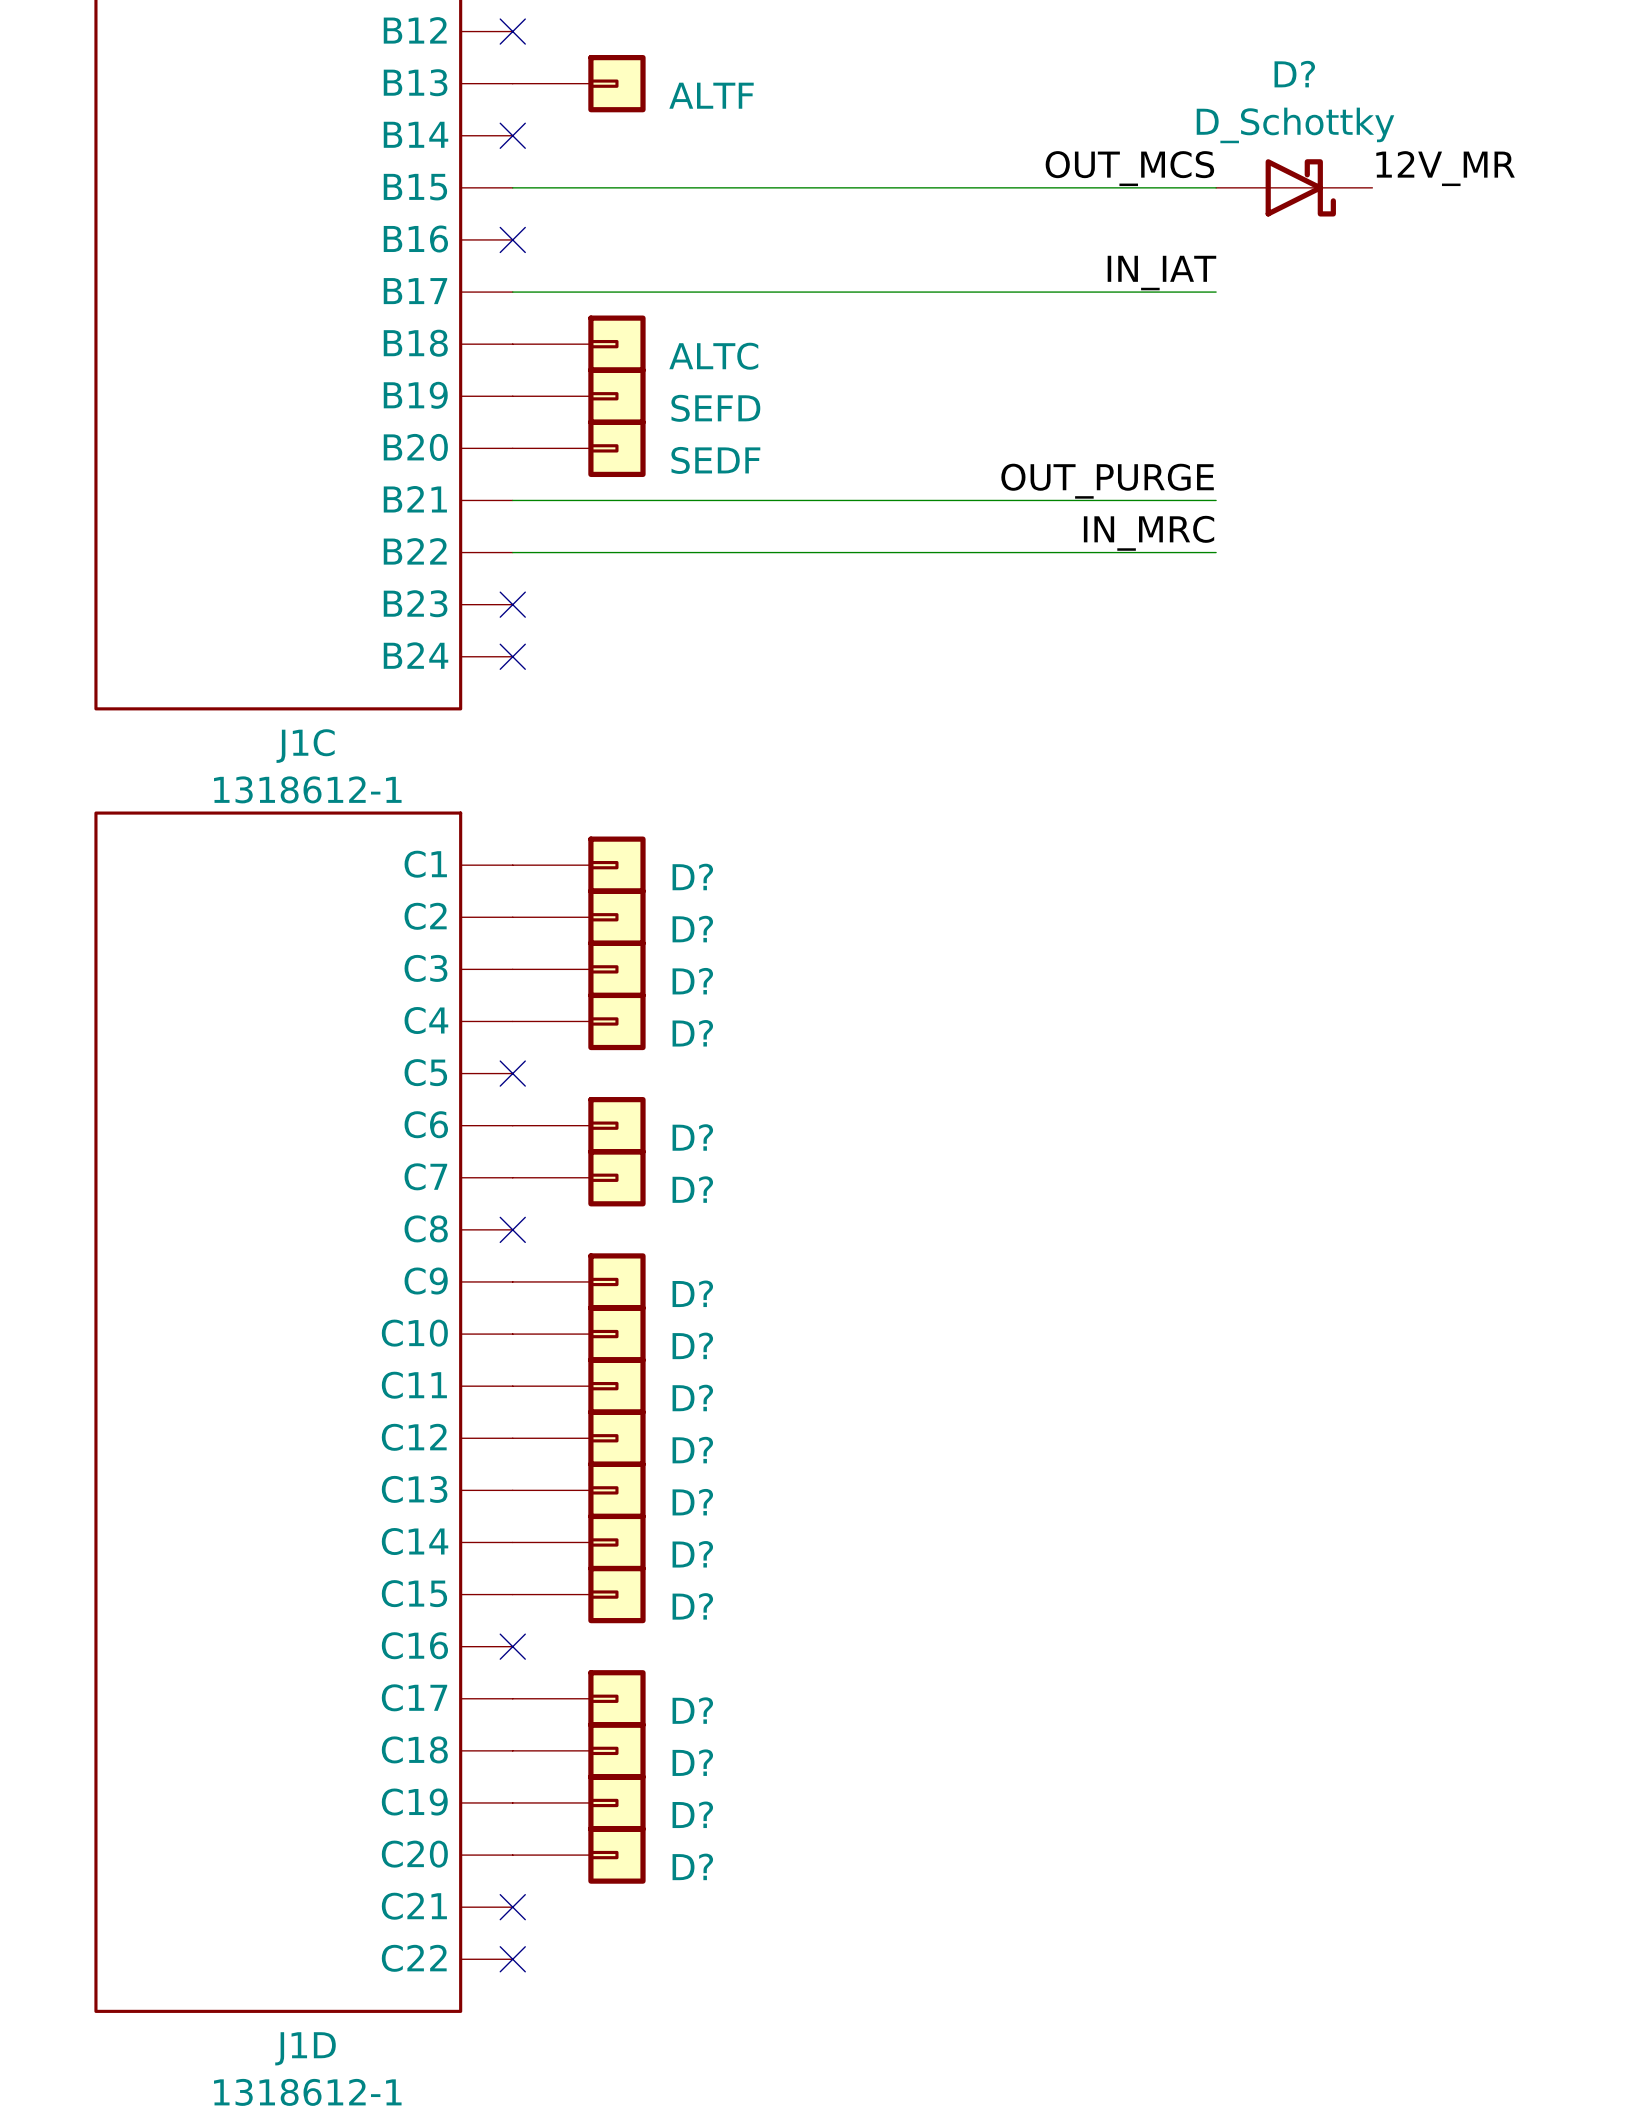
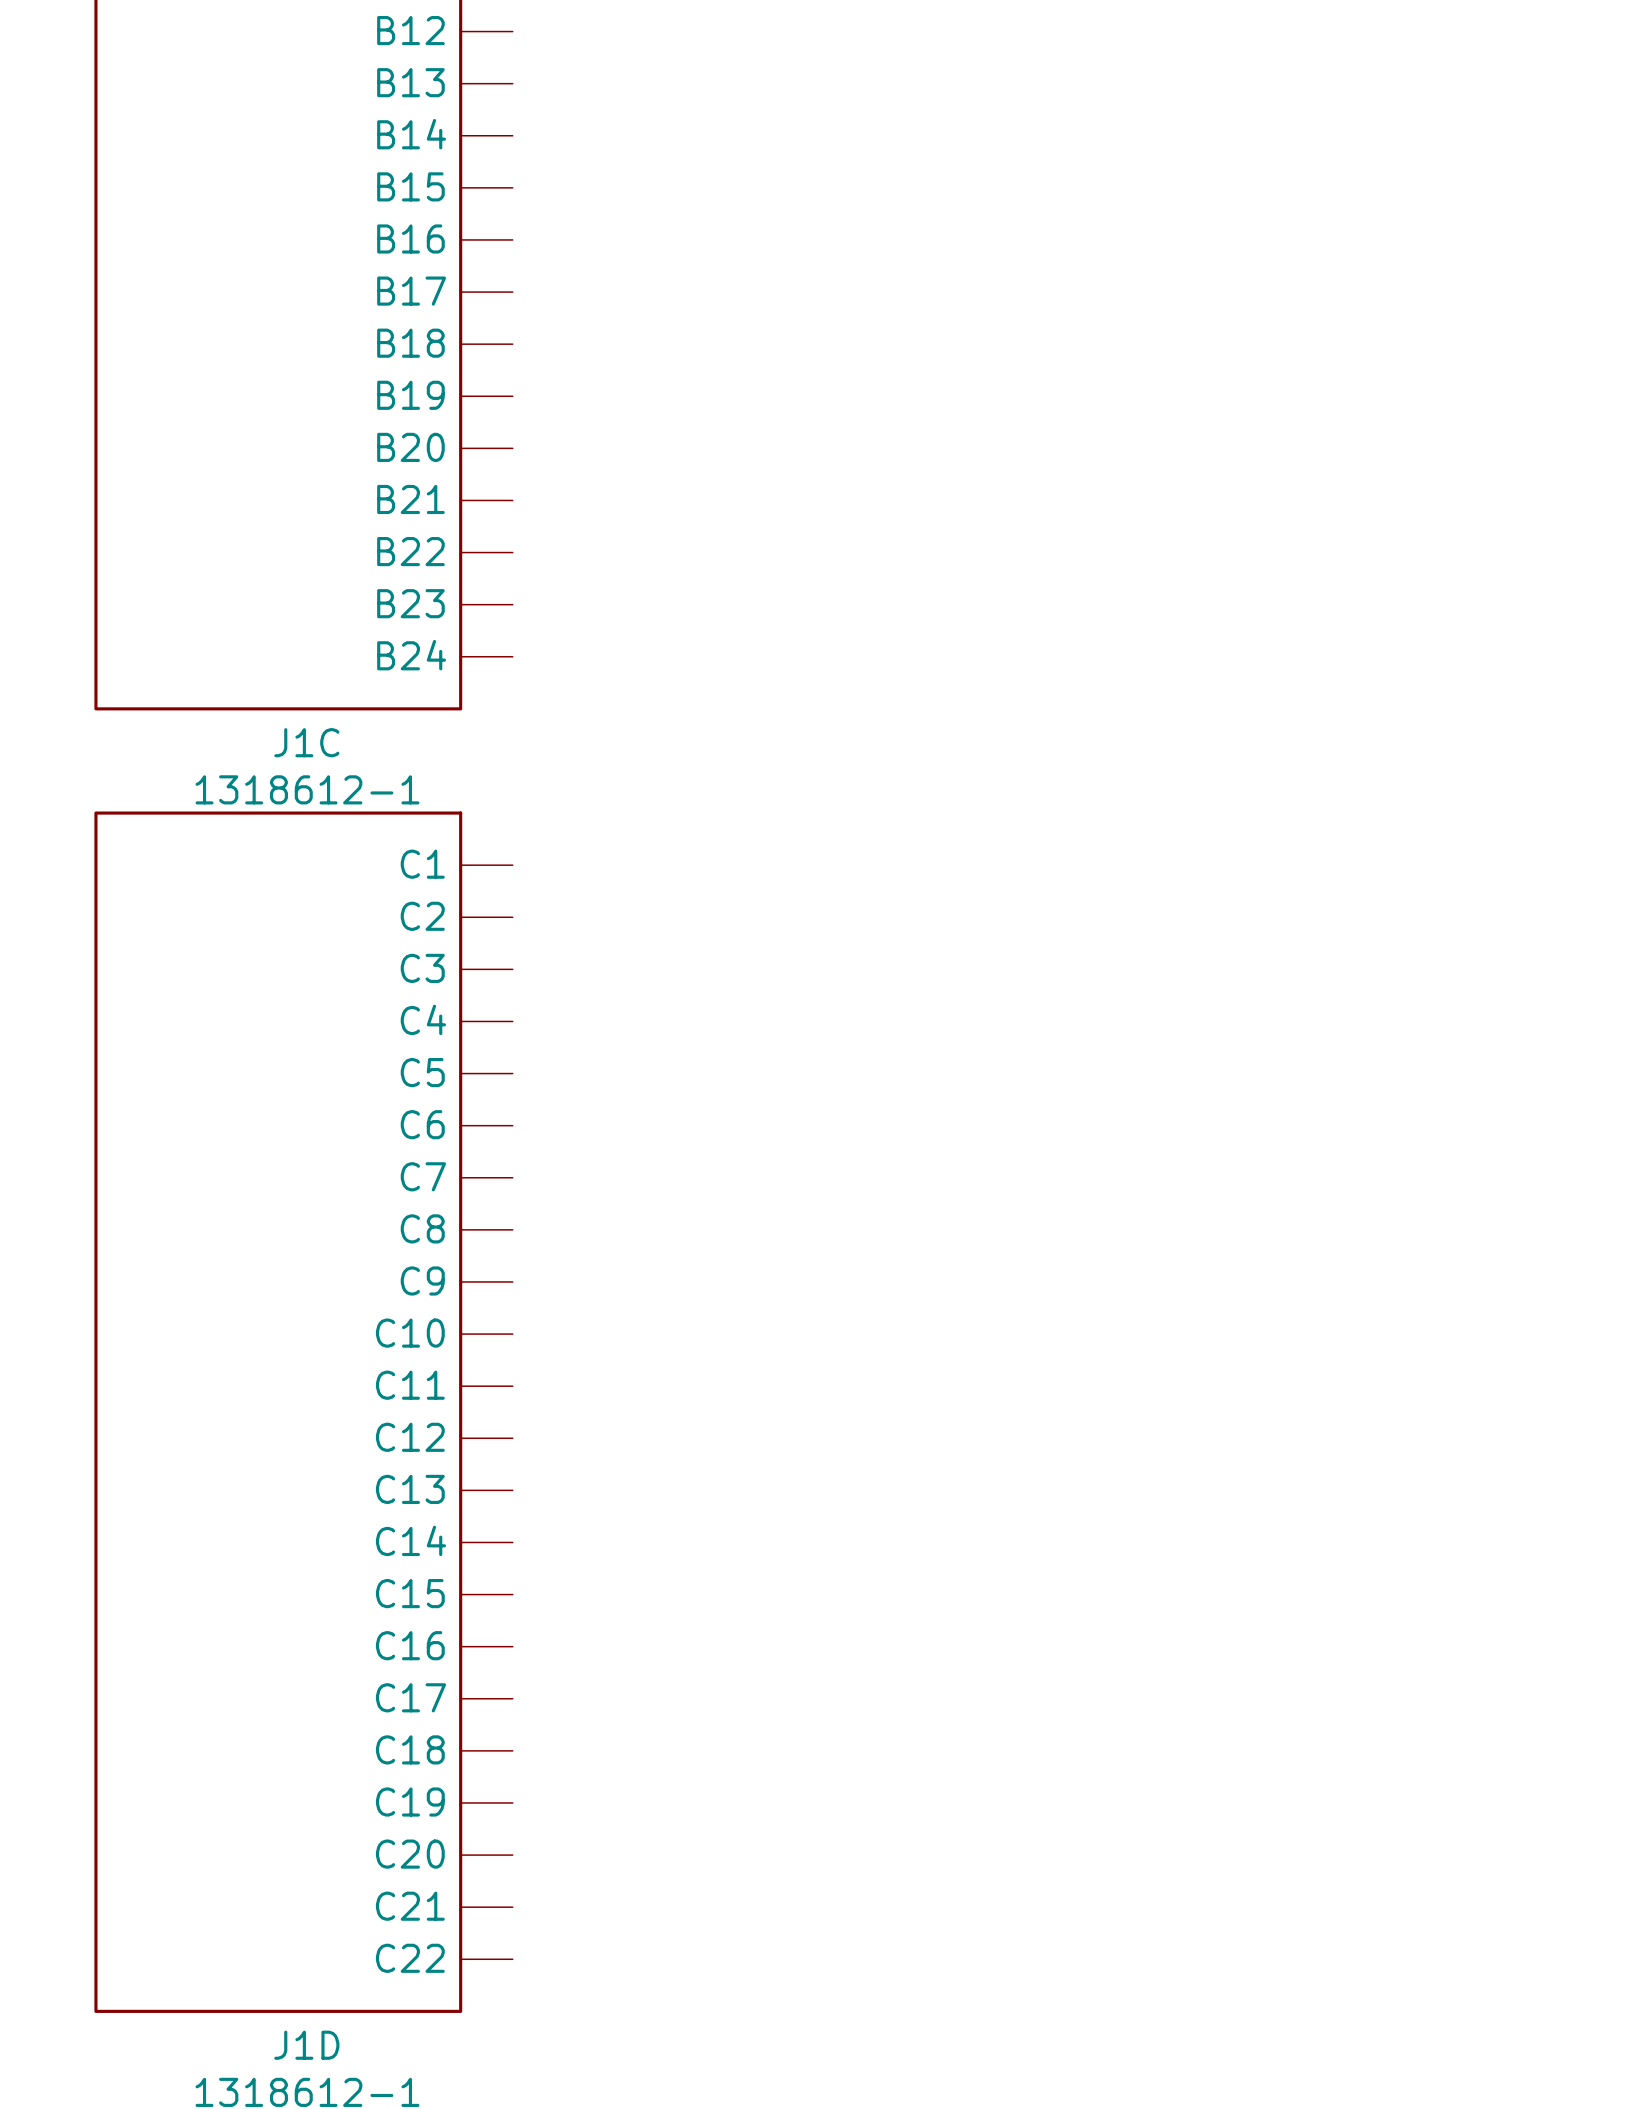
no-connect mark: (512, 31) -> none
ALTF: (579, 83) -> none
no-connect mark: (512, 135) -> none
label: OUT_MCS (1129, 168) -> none
label: 12V_MR (1445, 168) -> none
wire: (512, 187) (1216, 187) -> none
D?: D_Schottky (1294, 187) -> none
no-connect mark: (512, 239) -> none
label: IN_IAT (1161, 273) -> none
wire: (512, 292) (1216, 292) -> none
ALTC: (579, 344) -> none
SEFD: (579, 396) -> none
SEDF: (579, 448) -> none
label: OUT_PURGE (1107, 481) -> none
wire: (512, 500) (1216, 500) -> none
label: IN_MRC (1149, 533) -> none
wire: (512, 552) (1216, 552) -> none
no-connect mark: (512, 604) -> none
no-connect mark: (512, 656) -> none
D?: (579, 865) -> none
D?: (579, 917) -> none
D?: (579, 969) -> none
D?: (579, 1021) -> none
no-connect mark: (512, 1073) -> none
D?: (579, 1125) -> none
D?: (579, 1177) -> none
no-connect mark: (512, 1229) -> none
D?: (579, 1281) -> none
D?: (579, 1334) -> none
D?: (579, 1386) -> none
D?: (579, 1438) -> none
D?: (579, 1490) -> none
D?: (579, 1542) -> none
D?: (579, 1594) -> none
no-connect mark: (512, 1646) -> none
D?: (579, 1698) -> none
D?: (579, 1750) -> none
D?: (579, 1802) -> none
D?: (579, 1855) -> none
no-connect mark: (512, 1907) -> none
no-connect mark: (512, 1959) -> none

